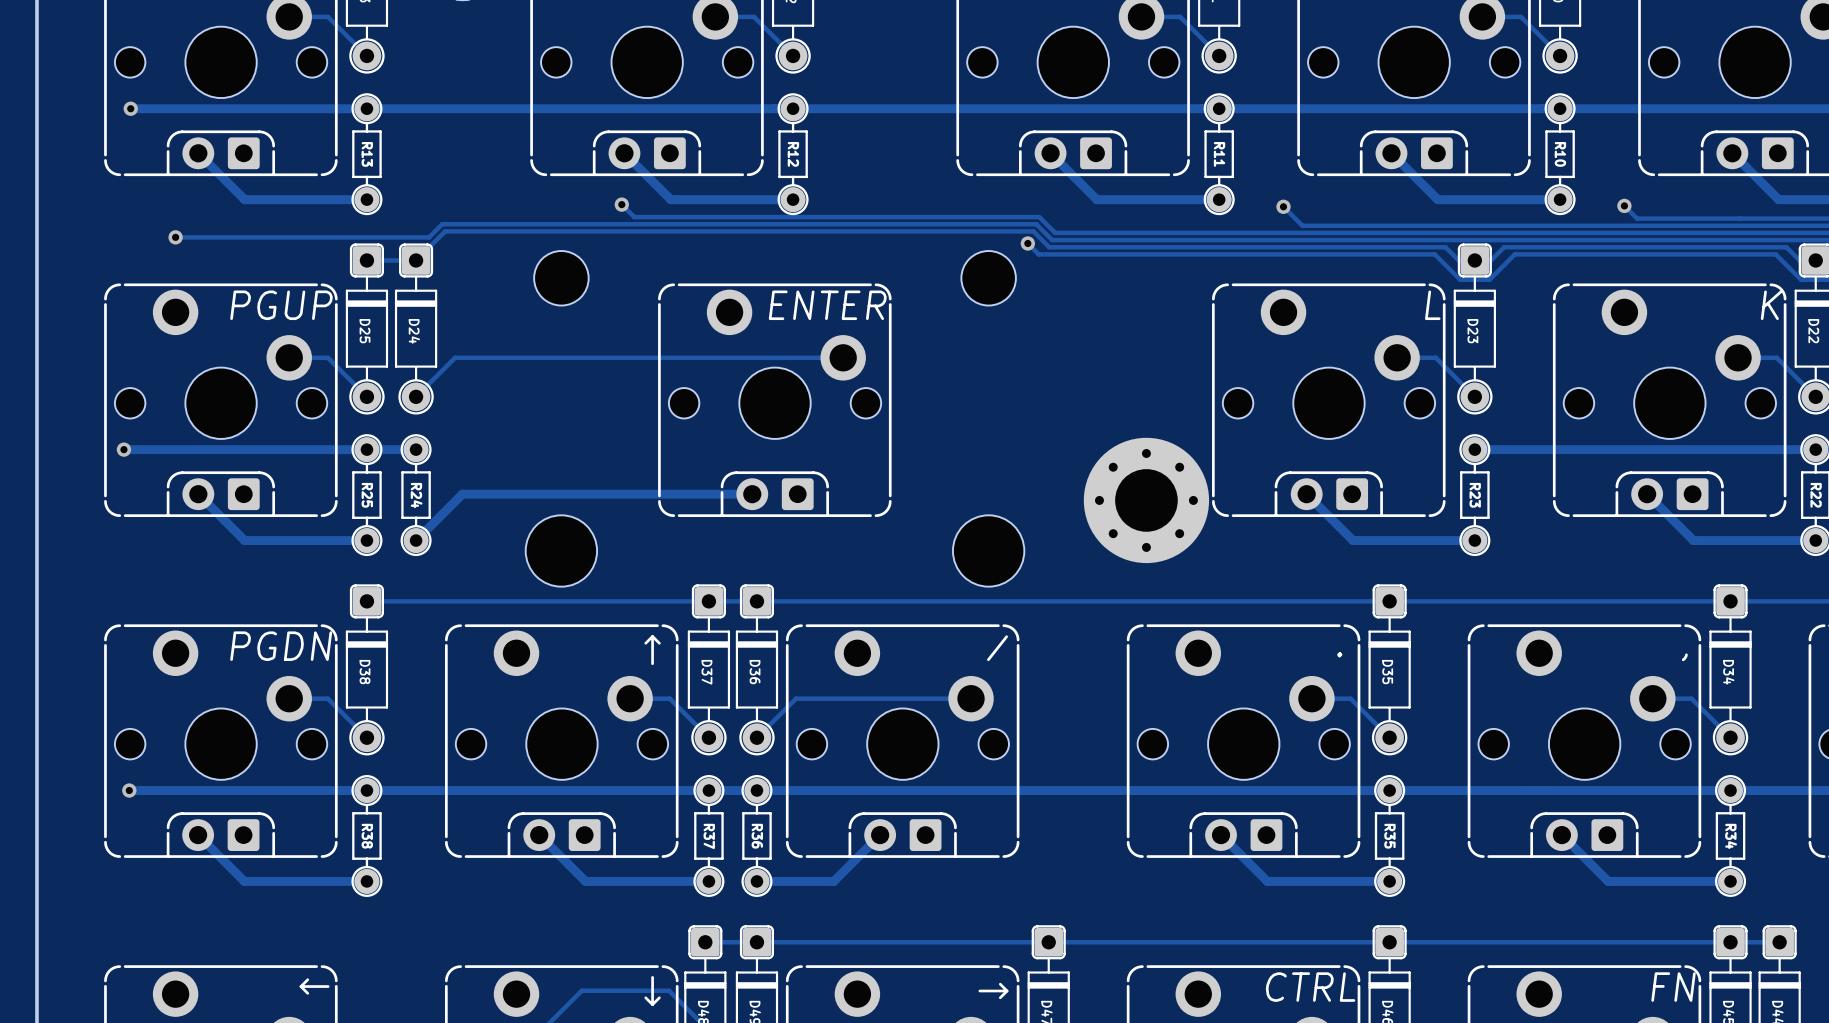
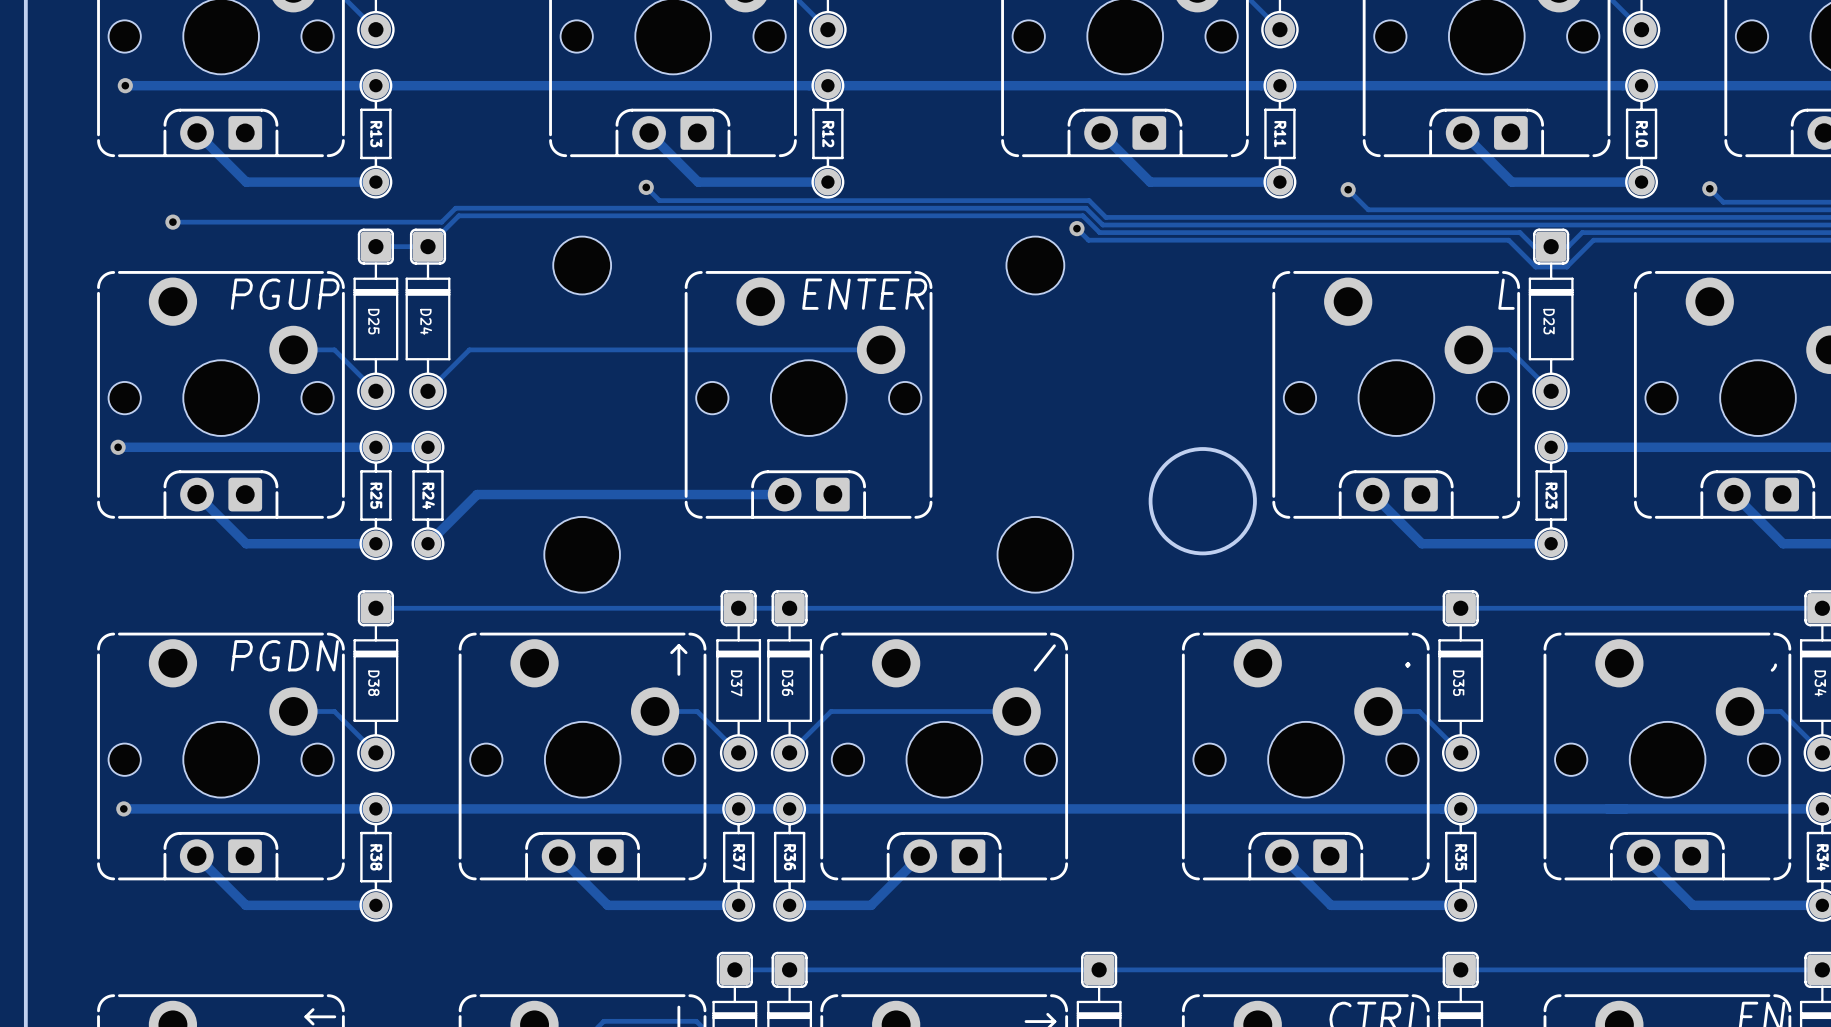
round board edge: none -> [1148, 447, 1257, 556]
part: (1146, 500) -> none

